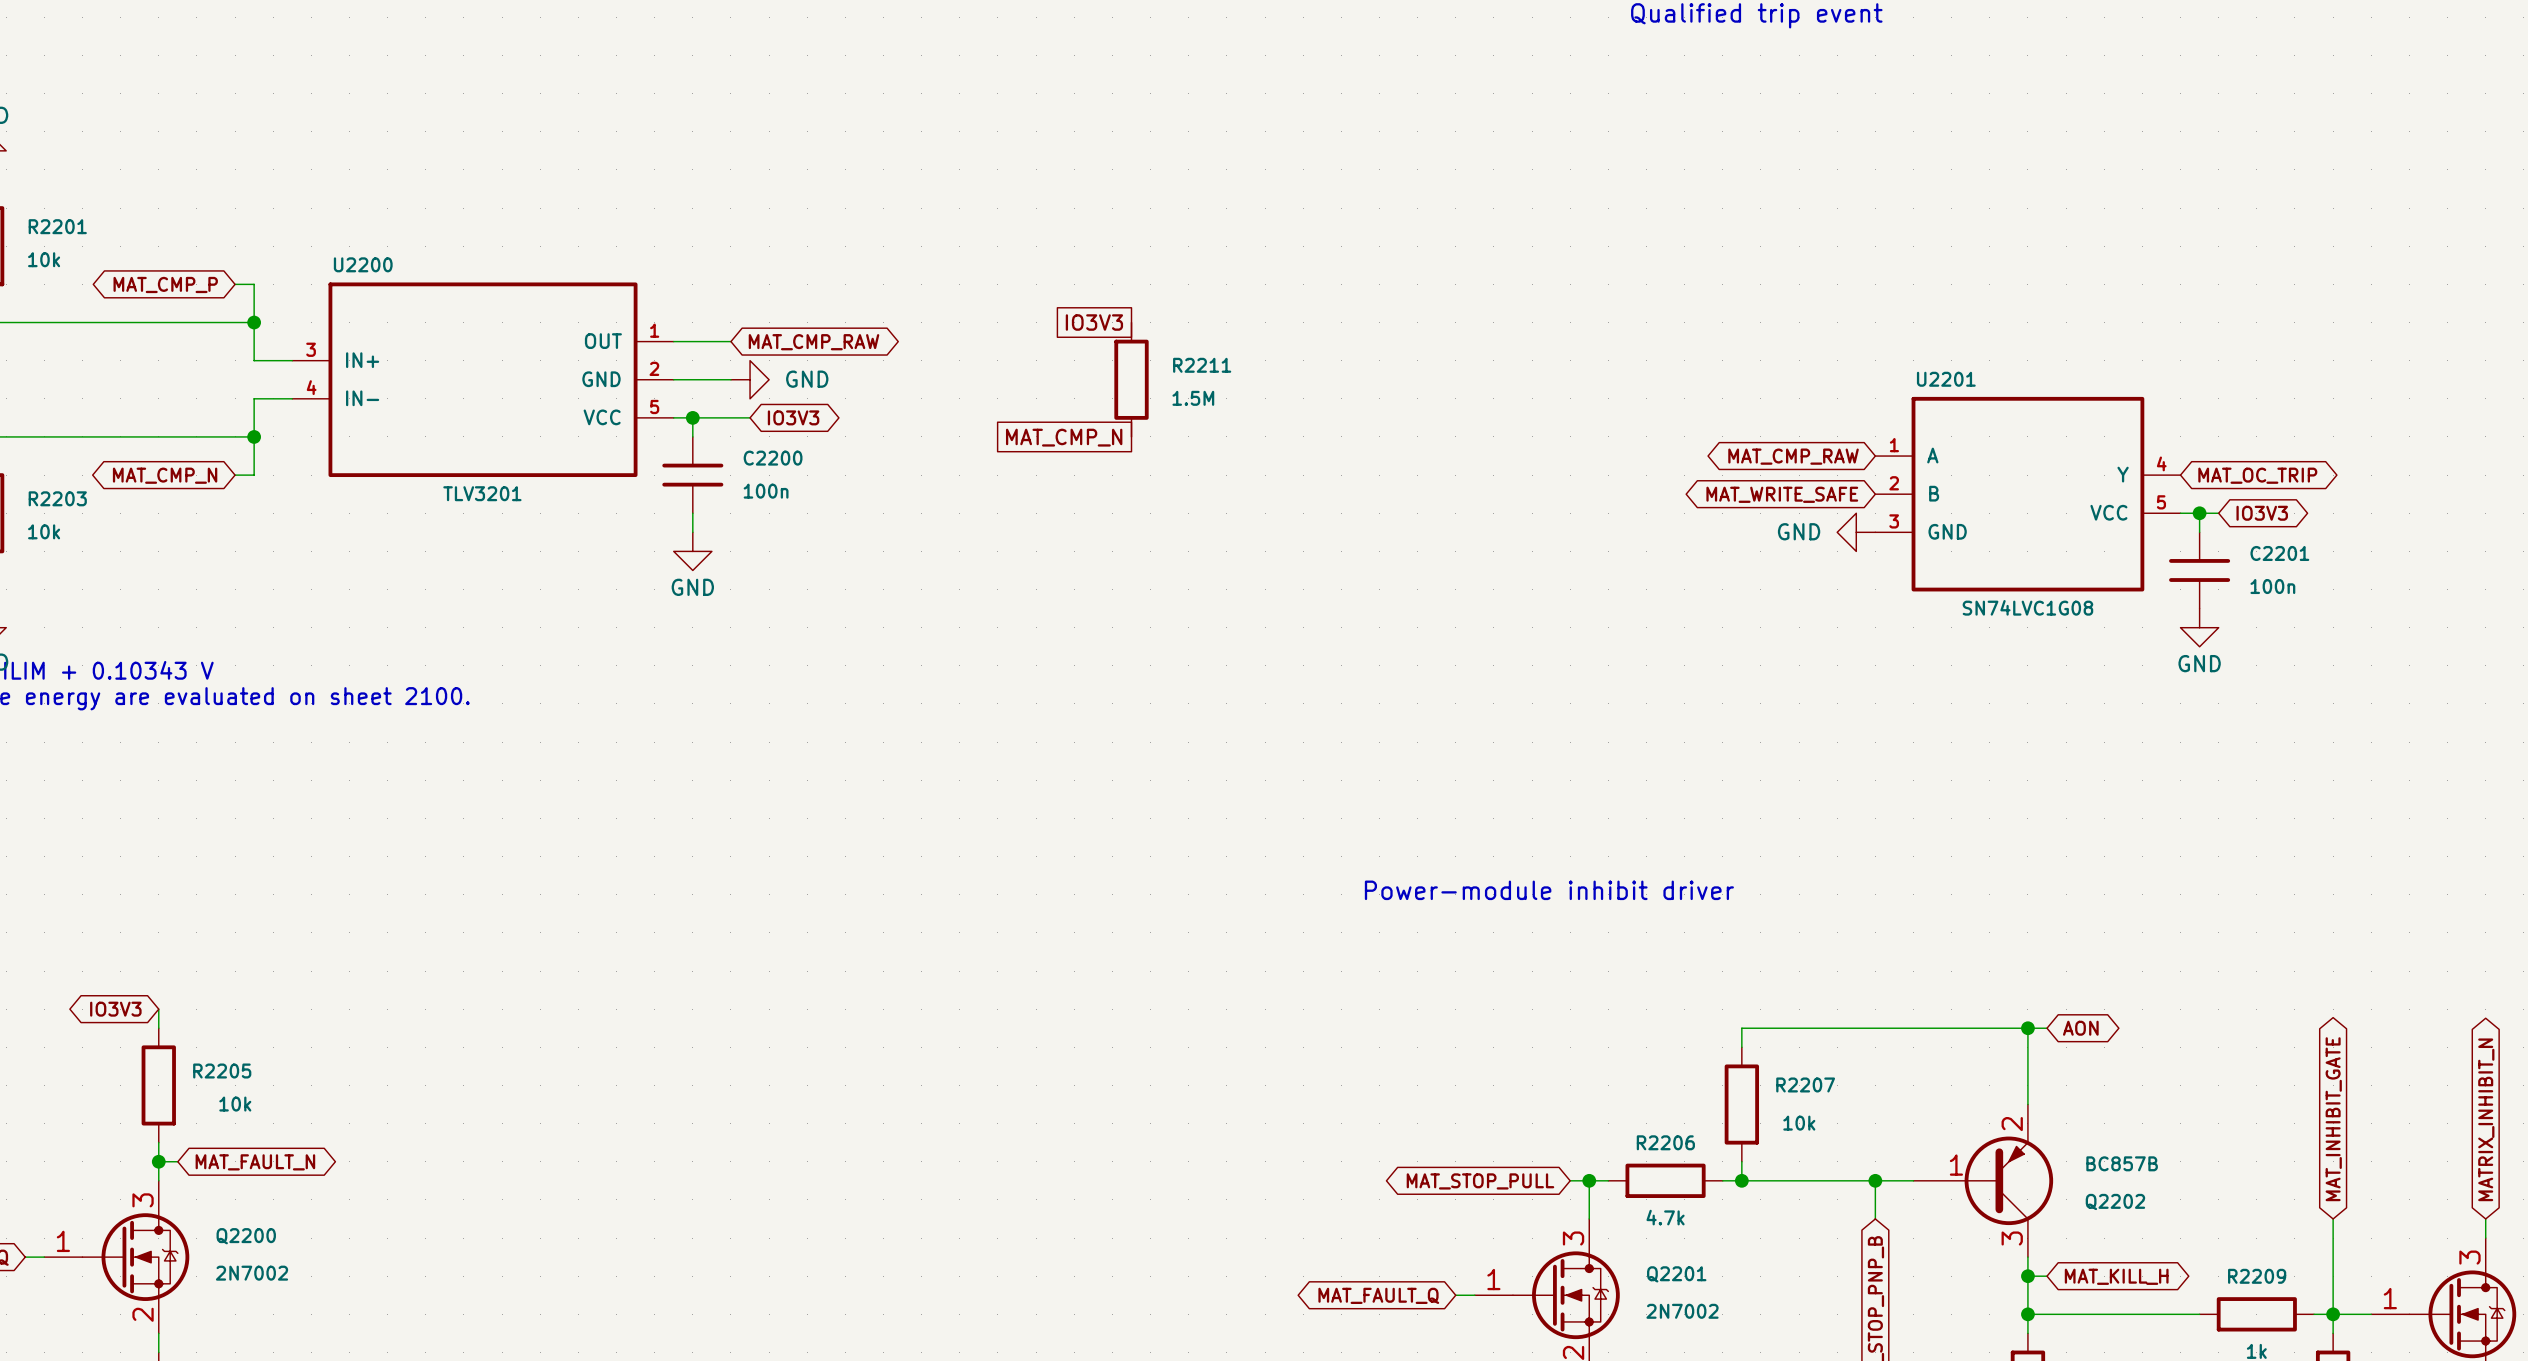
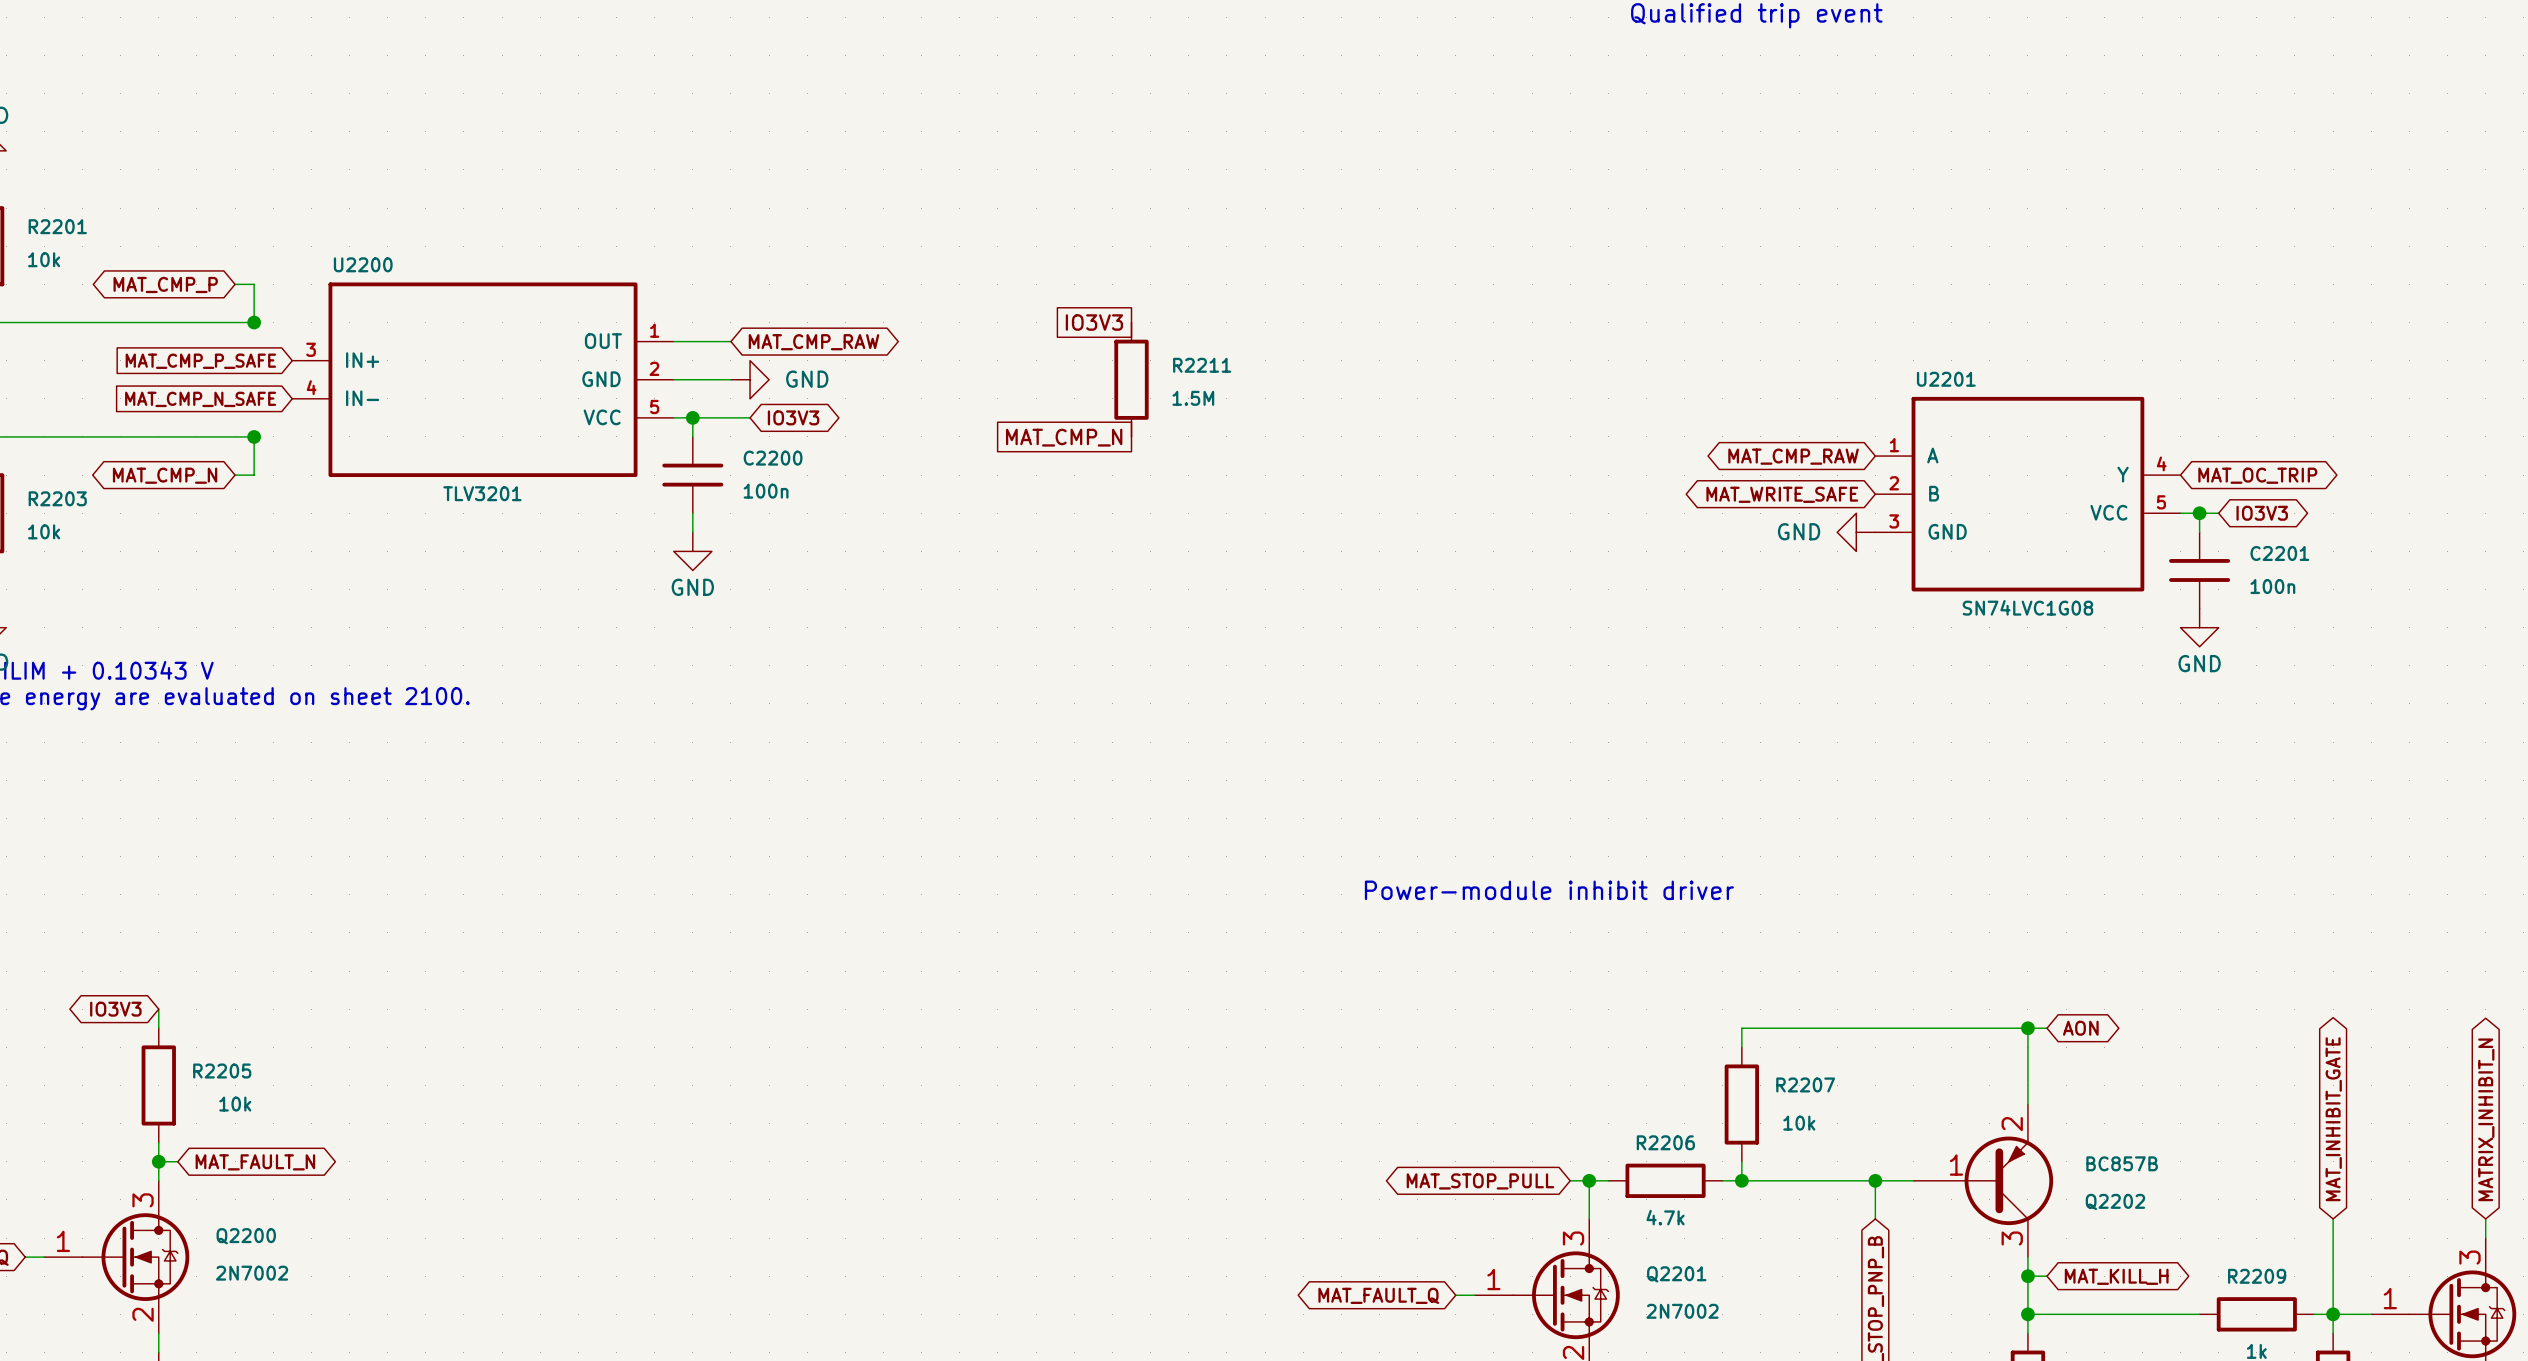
wire: (254, 322) (254, 360) (292, 360) -> none
global label: none -> MAT_CMP_P_SAFE (200, 361)
wire: (292, 398) (254, 398) (254, 436) -> none
global label: none -> MAT_CMP_N_SAFE (200, 399)

